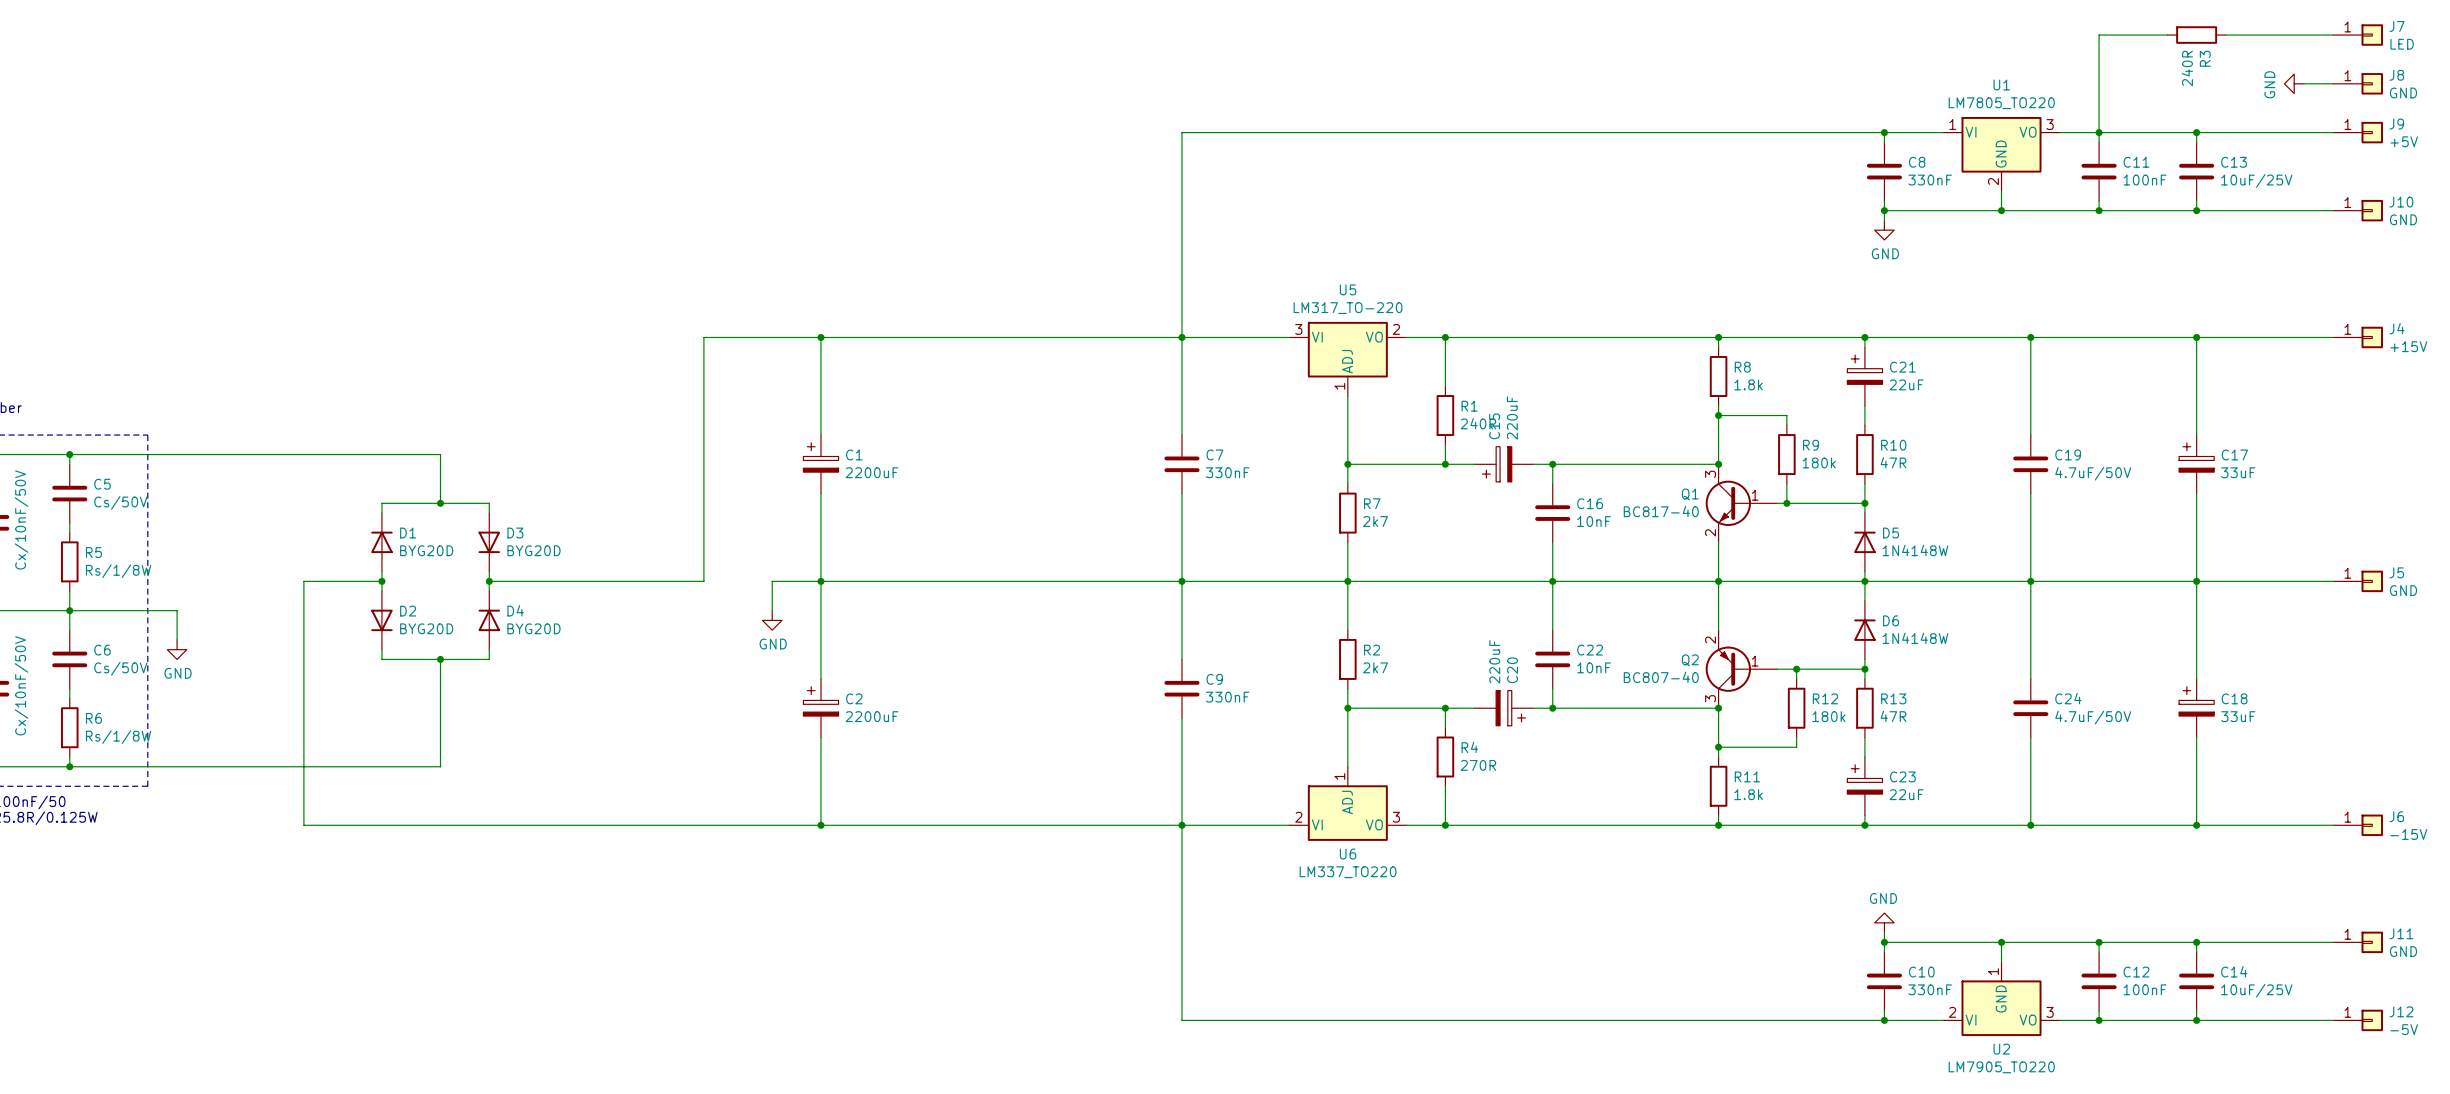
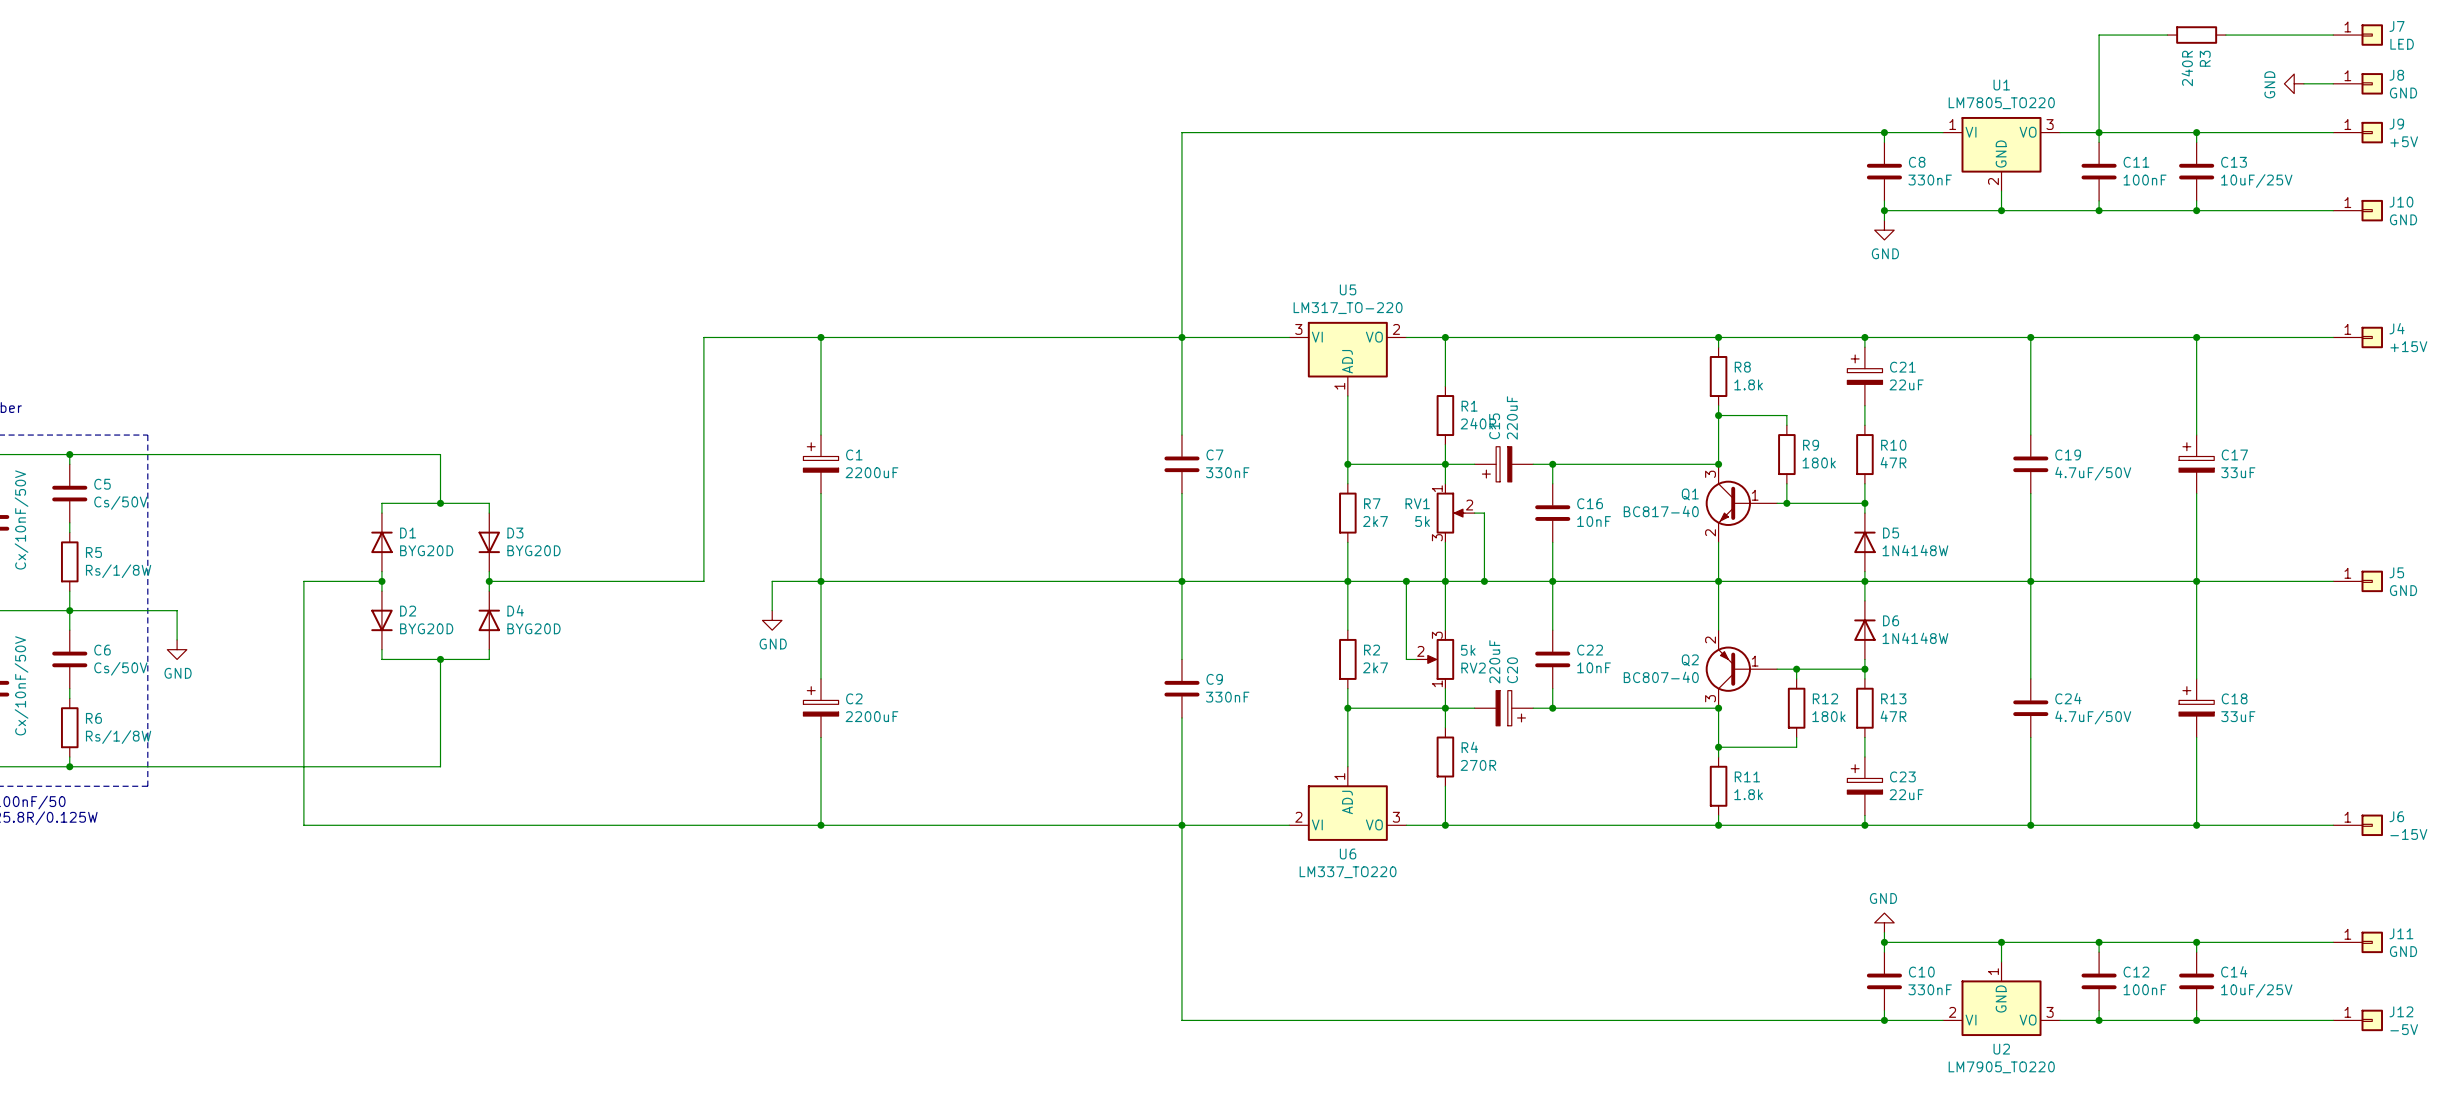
wire: none -> (1445, 464) (1445, 483)
RV1: none -> 5k (1455, 513)
wire: none -> (1474, 513) (1484, 513) (1484, 581)
wire: none -> (1445, 542) (1445, 630)
wire: none -> (1406, 581) (1406, 659) (1416, 659)
junction: none -> (1406, 581)
junction: none -> (1445, 581)
junction: none -> (1484, 581)
RV2: none -> 5k (1435, 659)
wire: none -> (1445, 688) (1445, 708)

